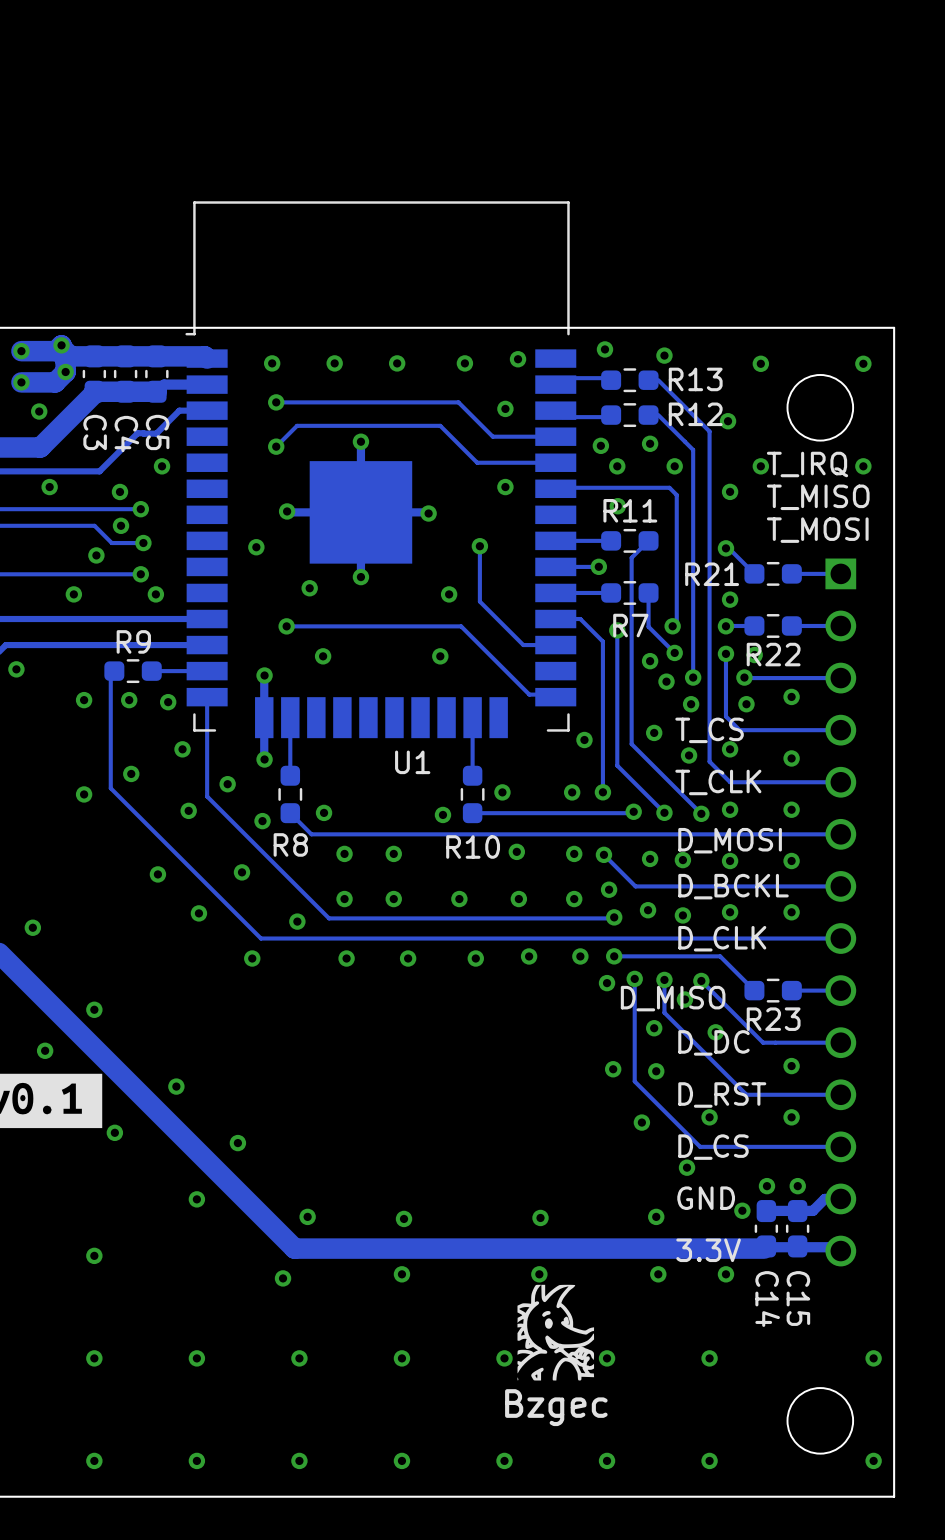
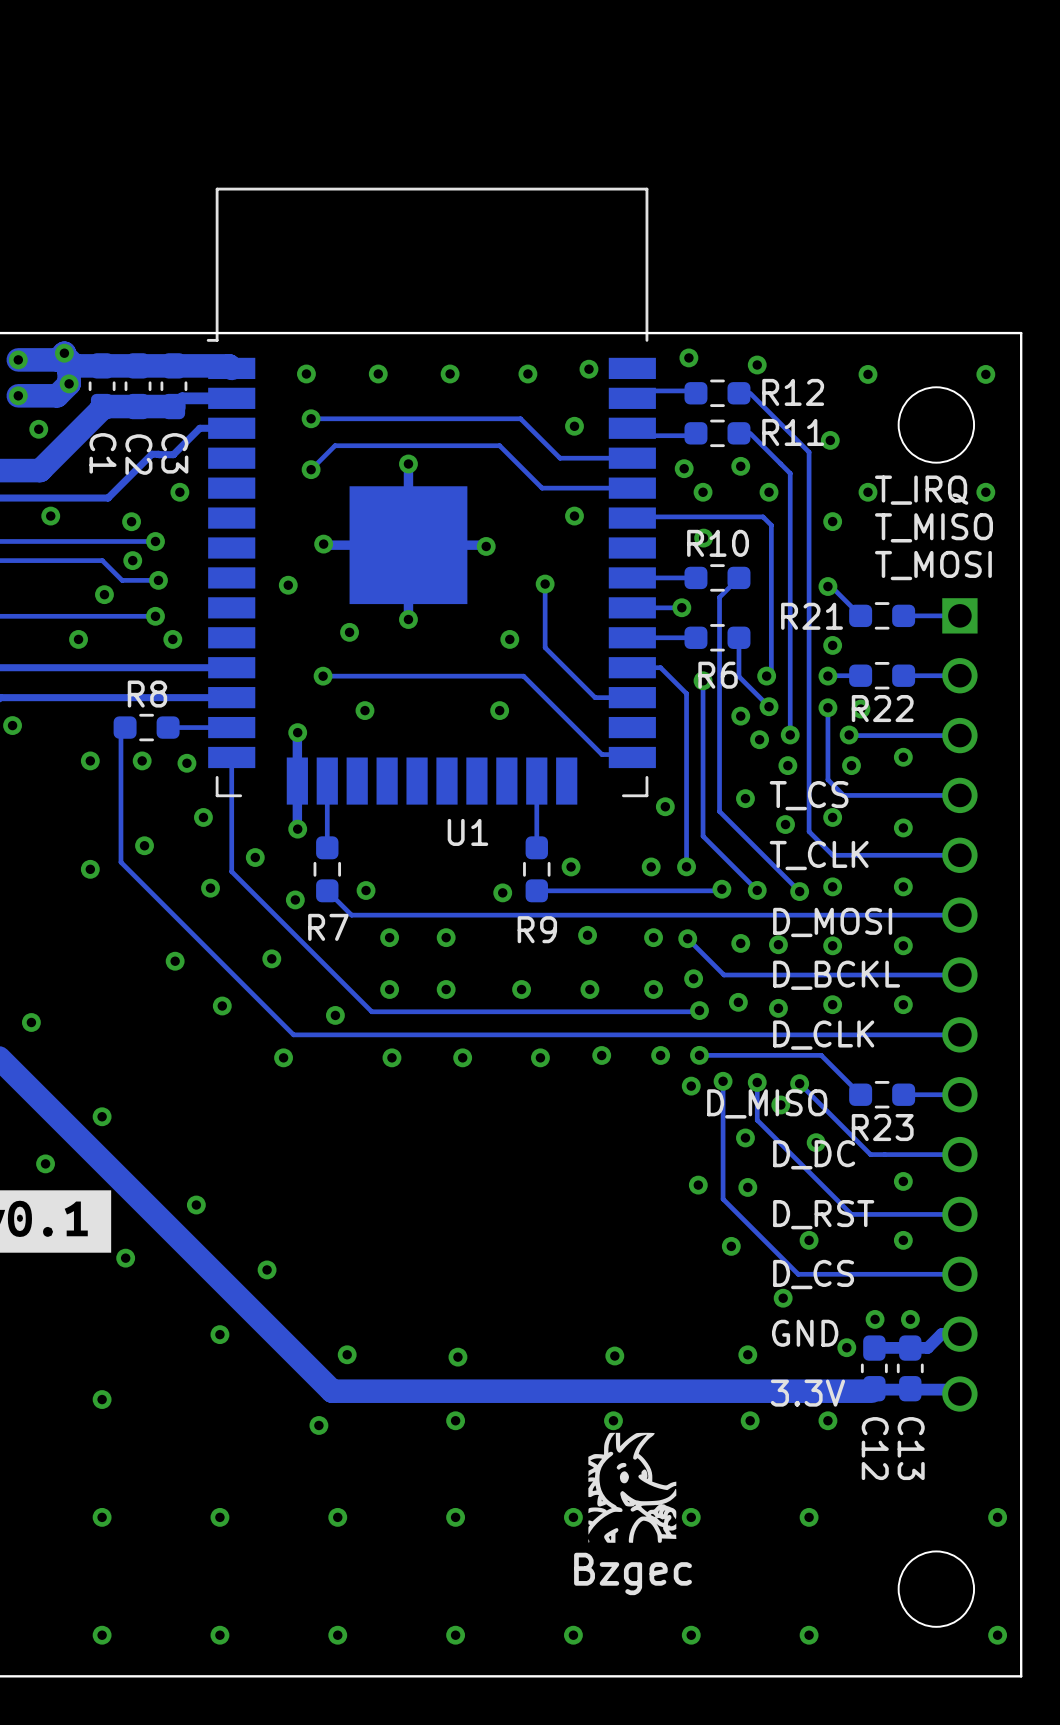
R13 name: R13 (695, 379) -> R12 (793, 392)
R12 name: R12 (695, 414) -> R11 (793, 432)
C3 name: C3 (95, 432) -> C1 (102, 453)
C5 name: C5 (157, 432) -> C3 (174, 453)
C4 name: C4 (126, 434) -> C2 (138, 454)
R11 name: R11 (630, 510) -> R10 (718, 543)
R7 name: R7 (630, 625) -> R6 (718, 675)
R9 name: R9 (133, 641) -> R8 (147, 694)
R8 name: R8 (290, 844) -> R7 (328, 927)
R10 name: R10 (473, 847) -> R9 (537, 929)
C15 name: C15 (798, 1298) -> C13 (911, 1448)
C14 name: C14 (767, 1299) -> C12 (875, 1448)

